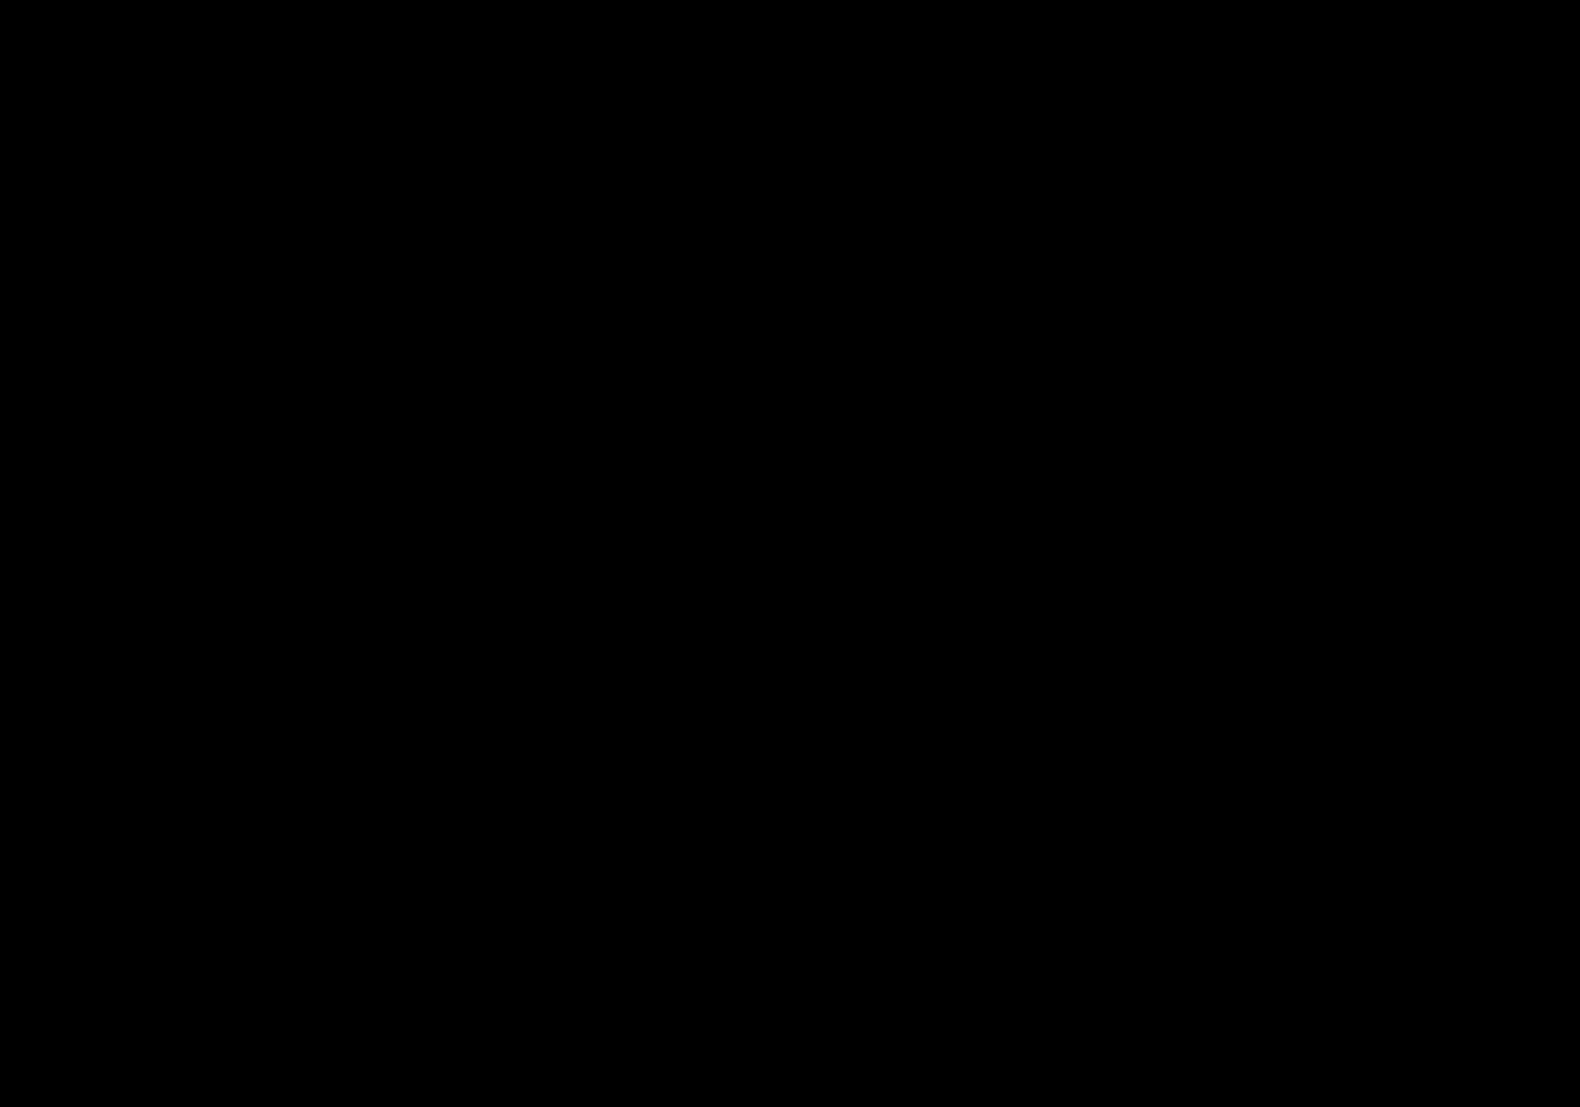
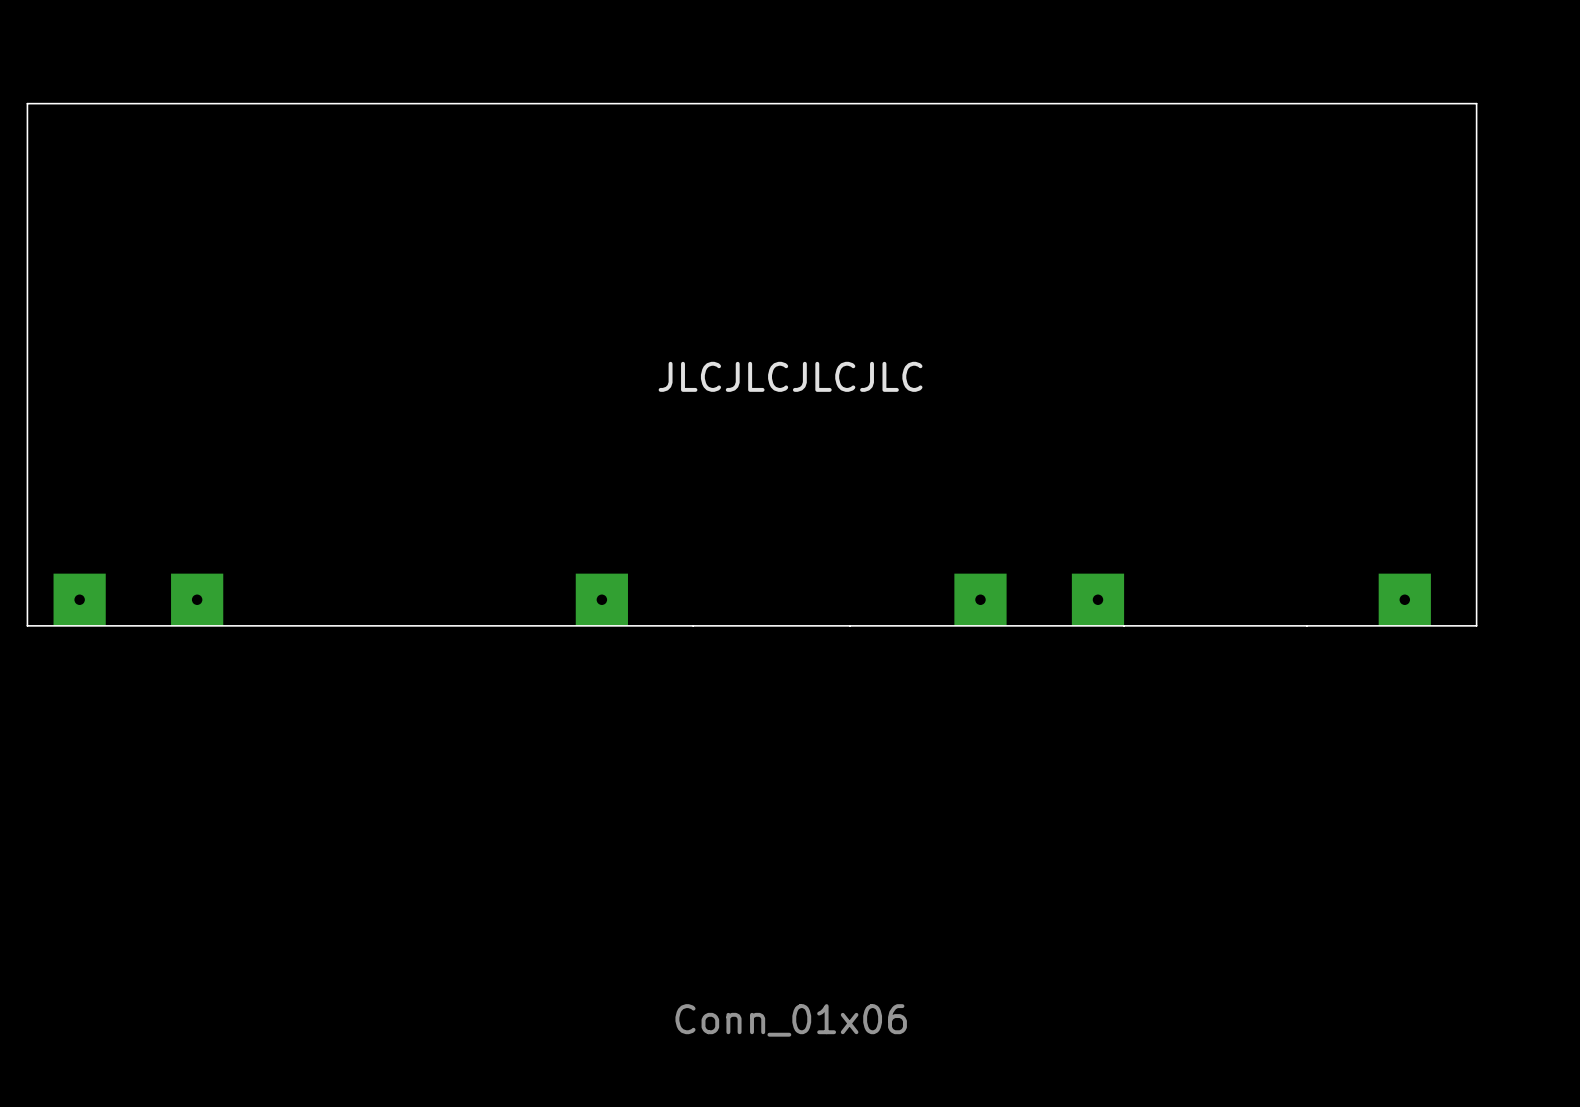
board edge: none -> (27, 103) (27, 625) (1476, 625) (1476, 103) (27, 103)
text: none -> JLCJLCJLCJLC (790, 376)
part: none -> Conn_01x06 (742, 599)

